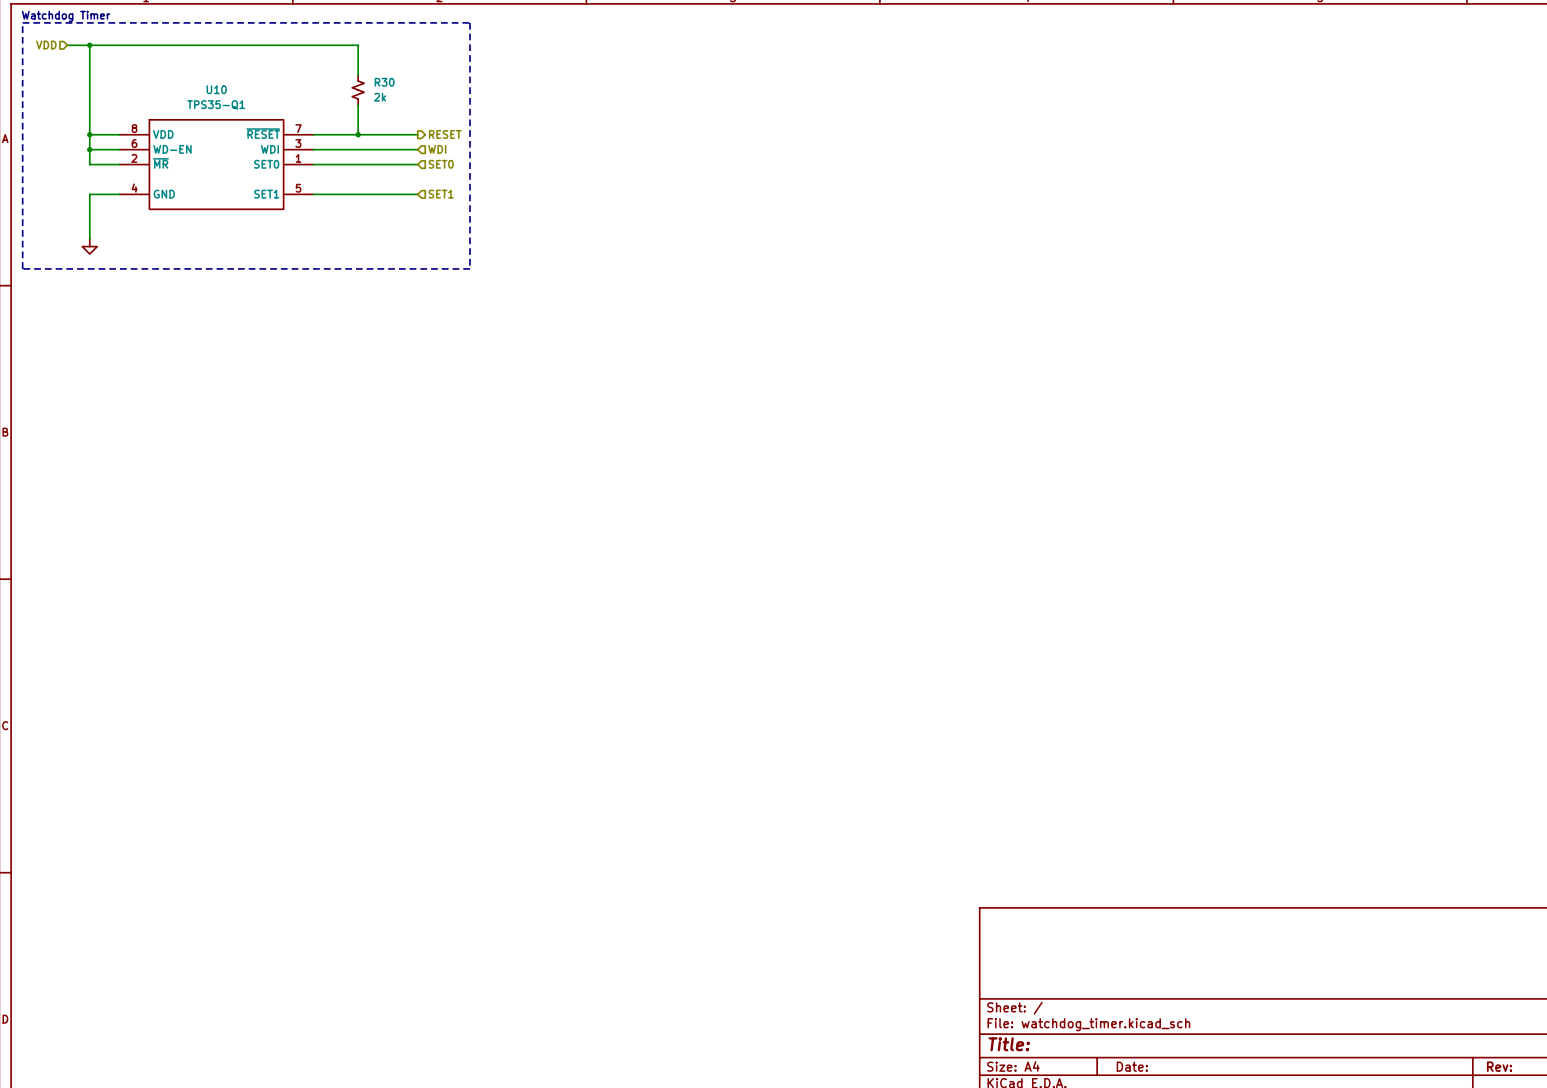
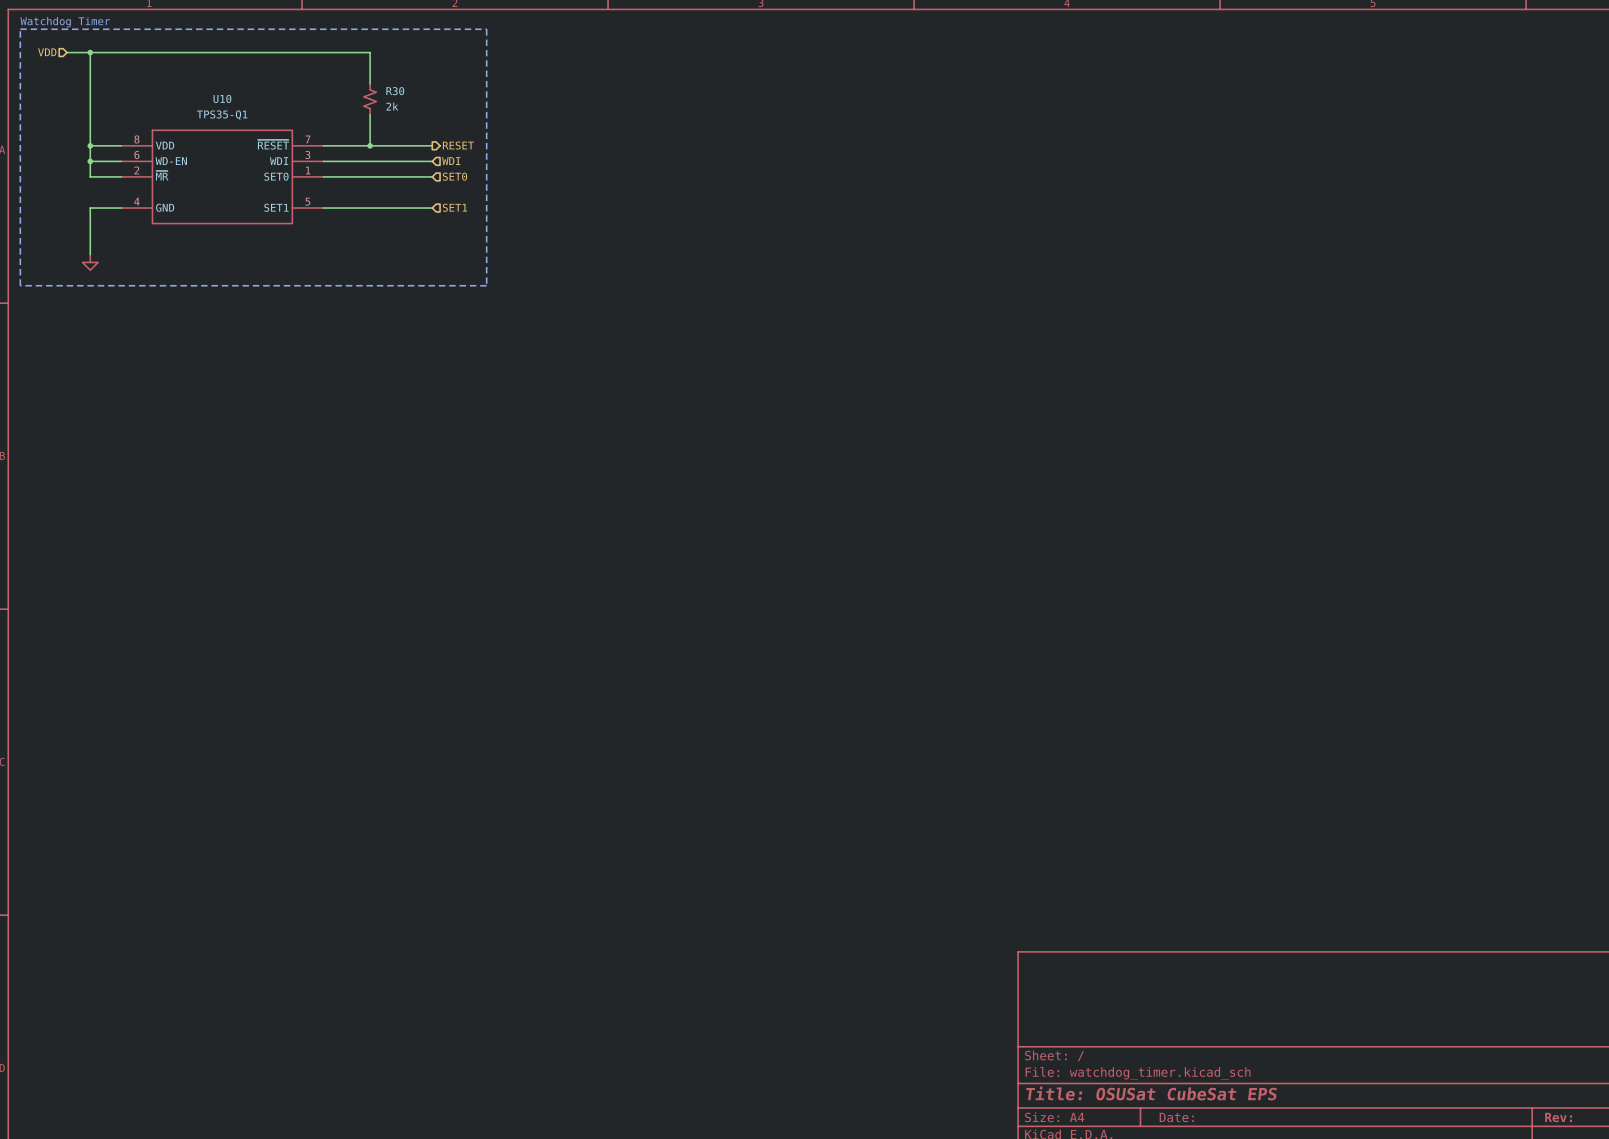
title block: Title: (1009, 1044) -> Title: OSUSat CubeSat EPS (1151, 1093)

